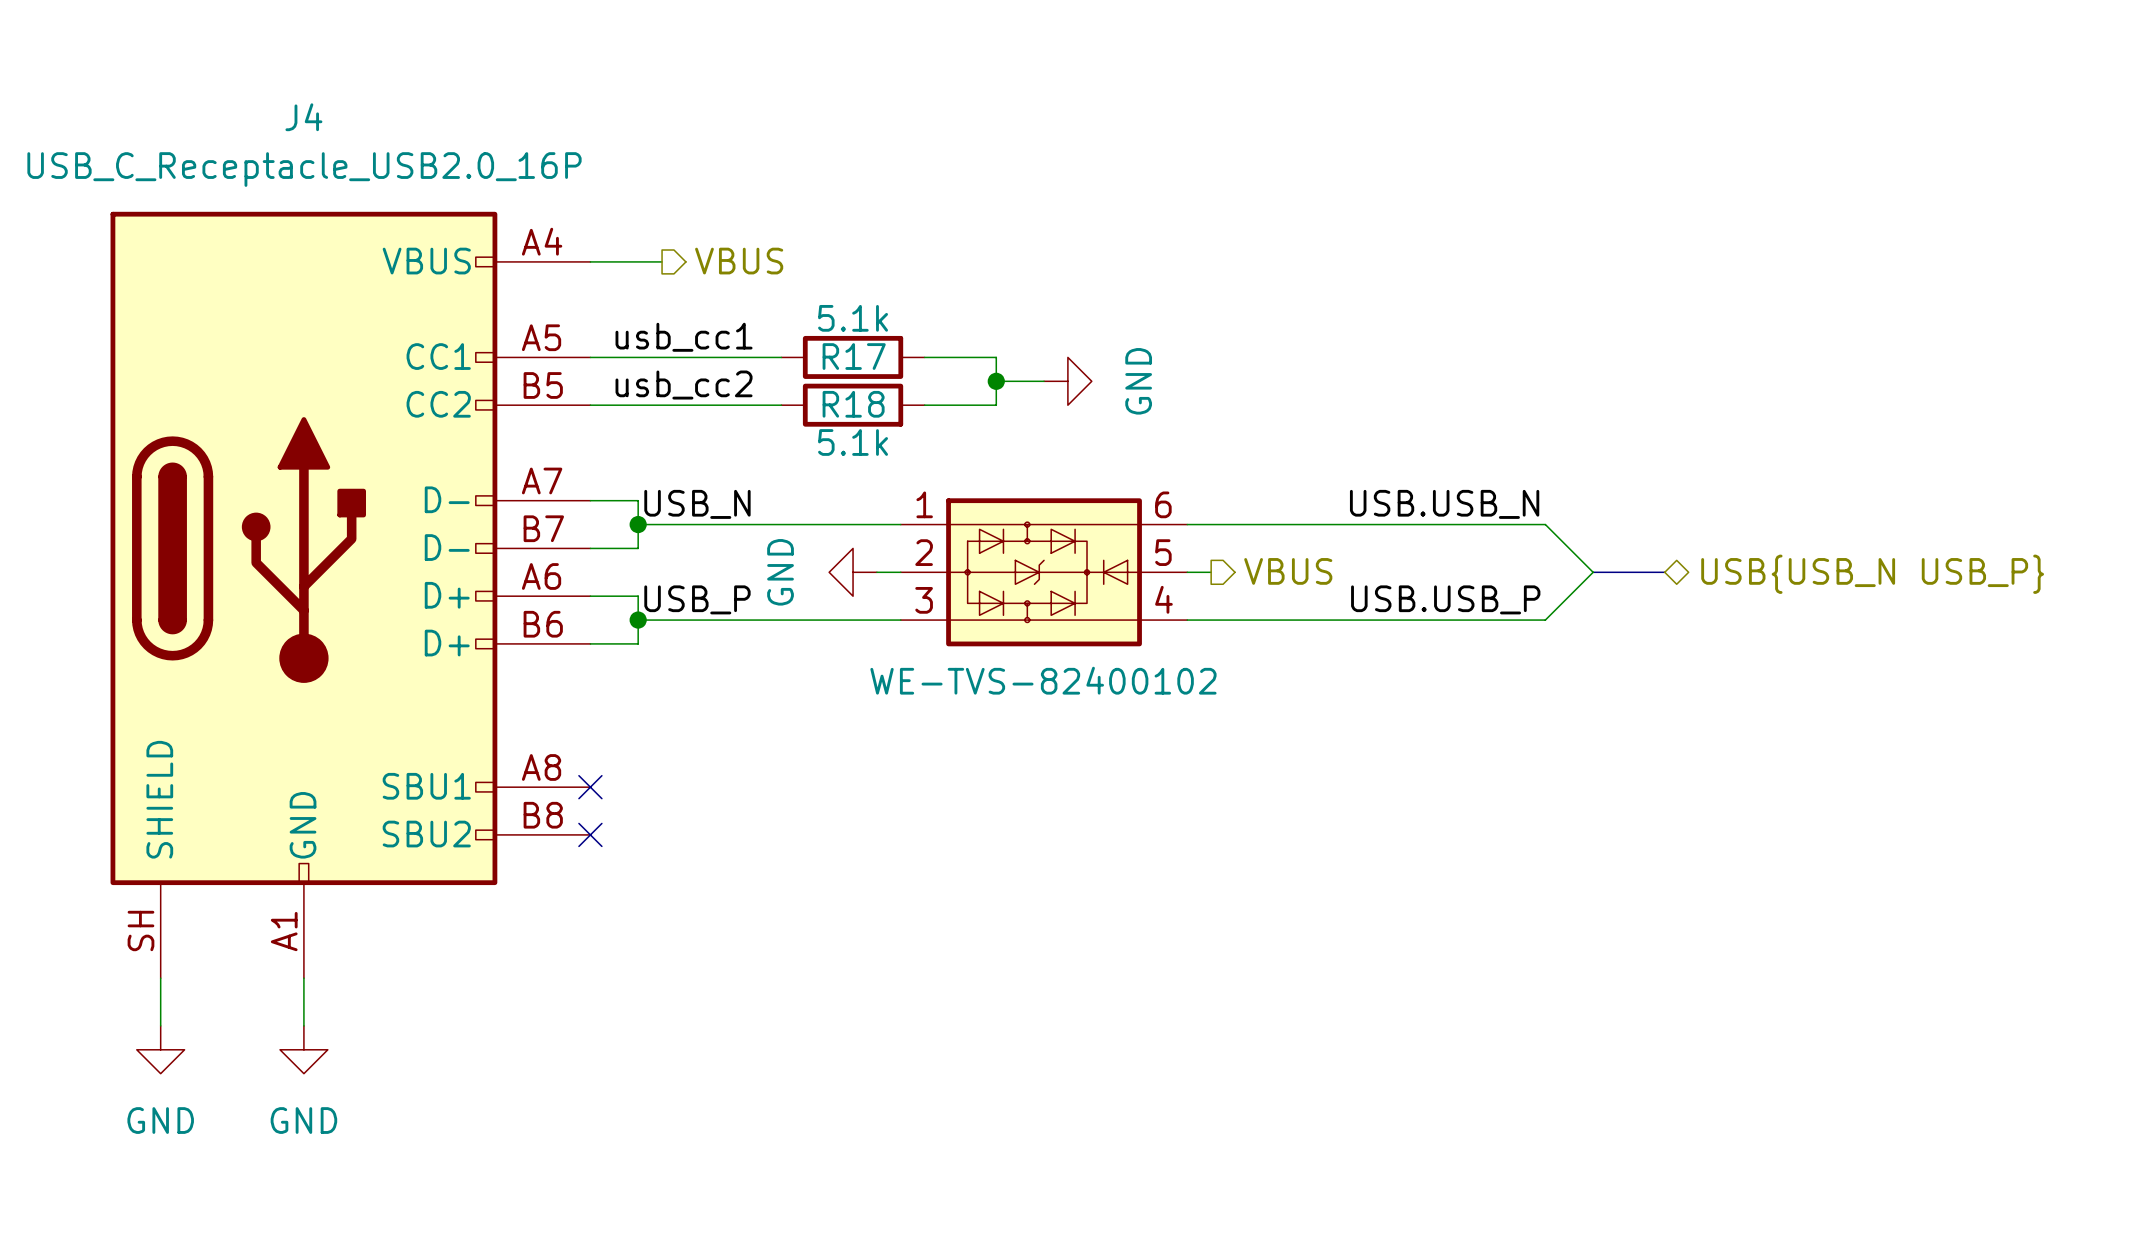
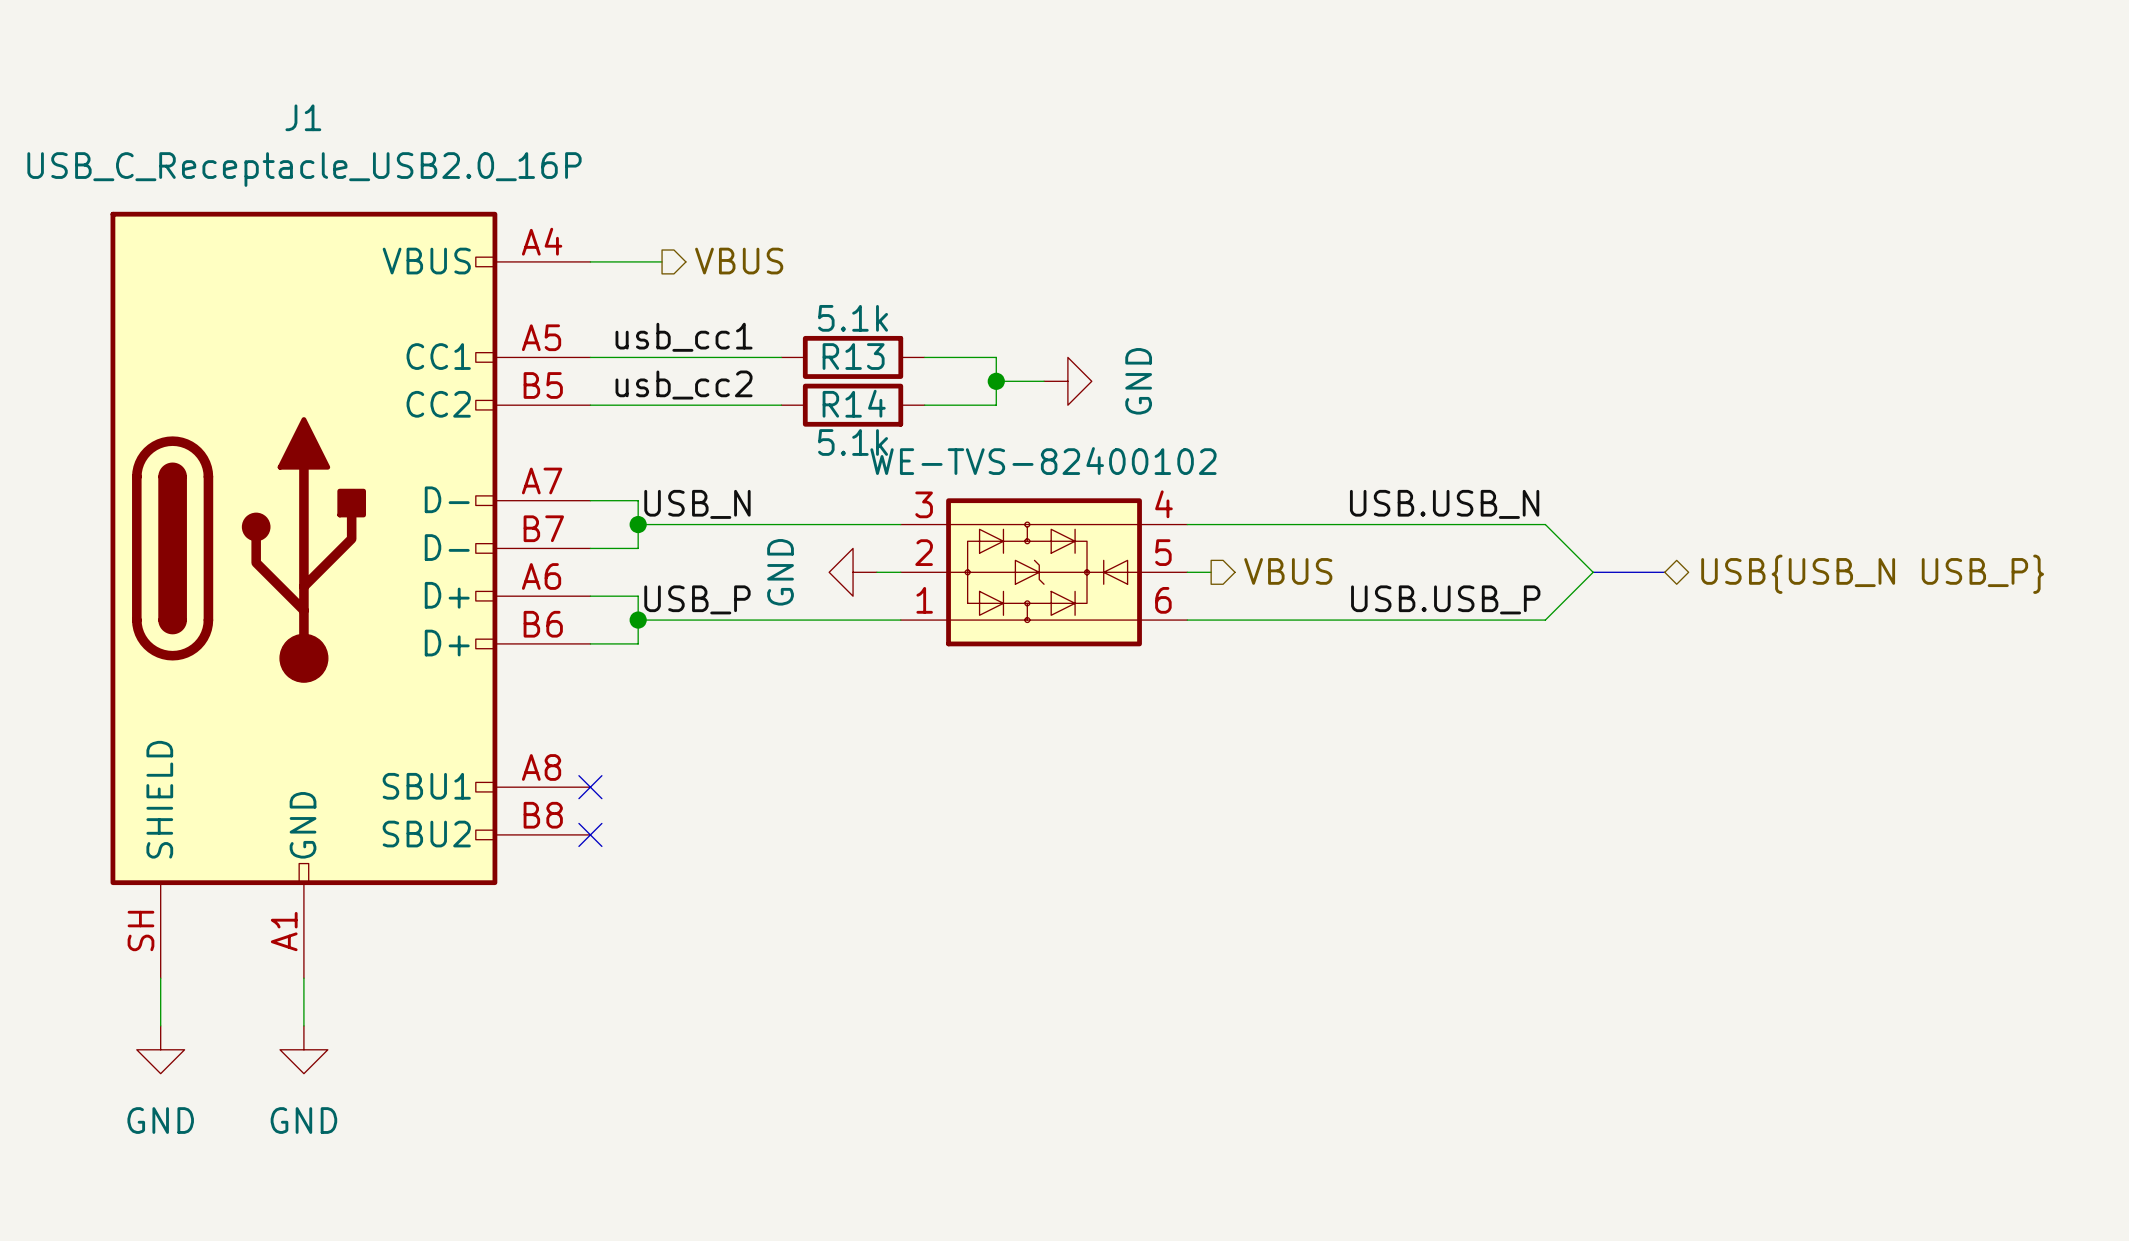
J4 name: J4 (303, 117) -> J1 (303, 117)
R17 name: R17 (854, 356) -> R13 (853, 356)
R18 name: R18 (853, 404) -> R14 (854, 403)
part flip: as is (1044, 572) -> up-down (1044, 572)

